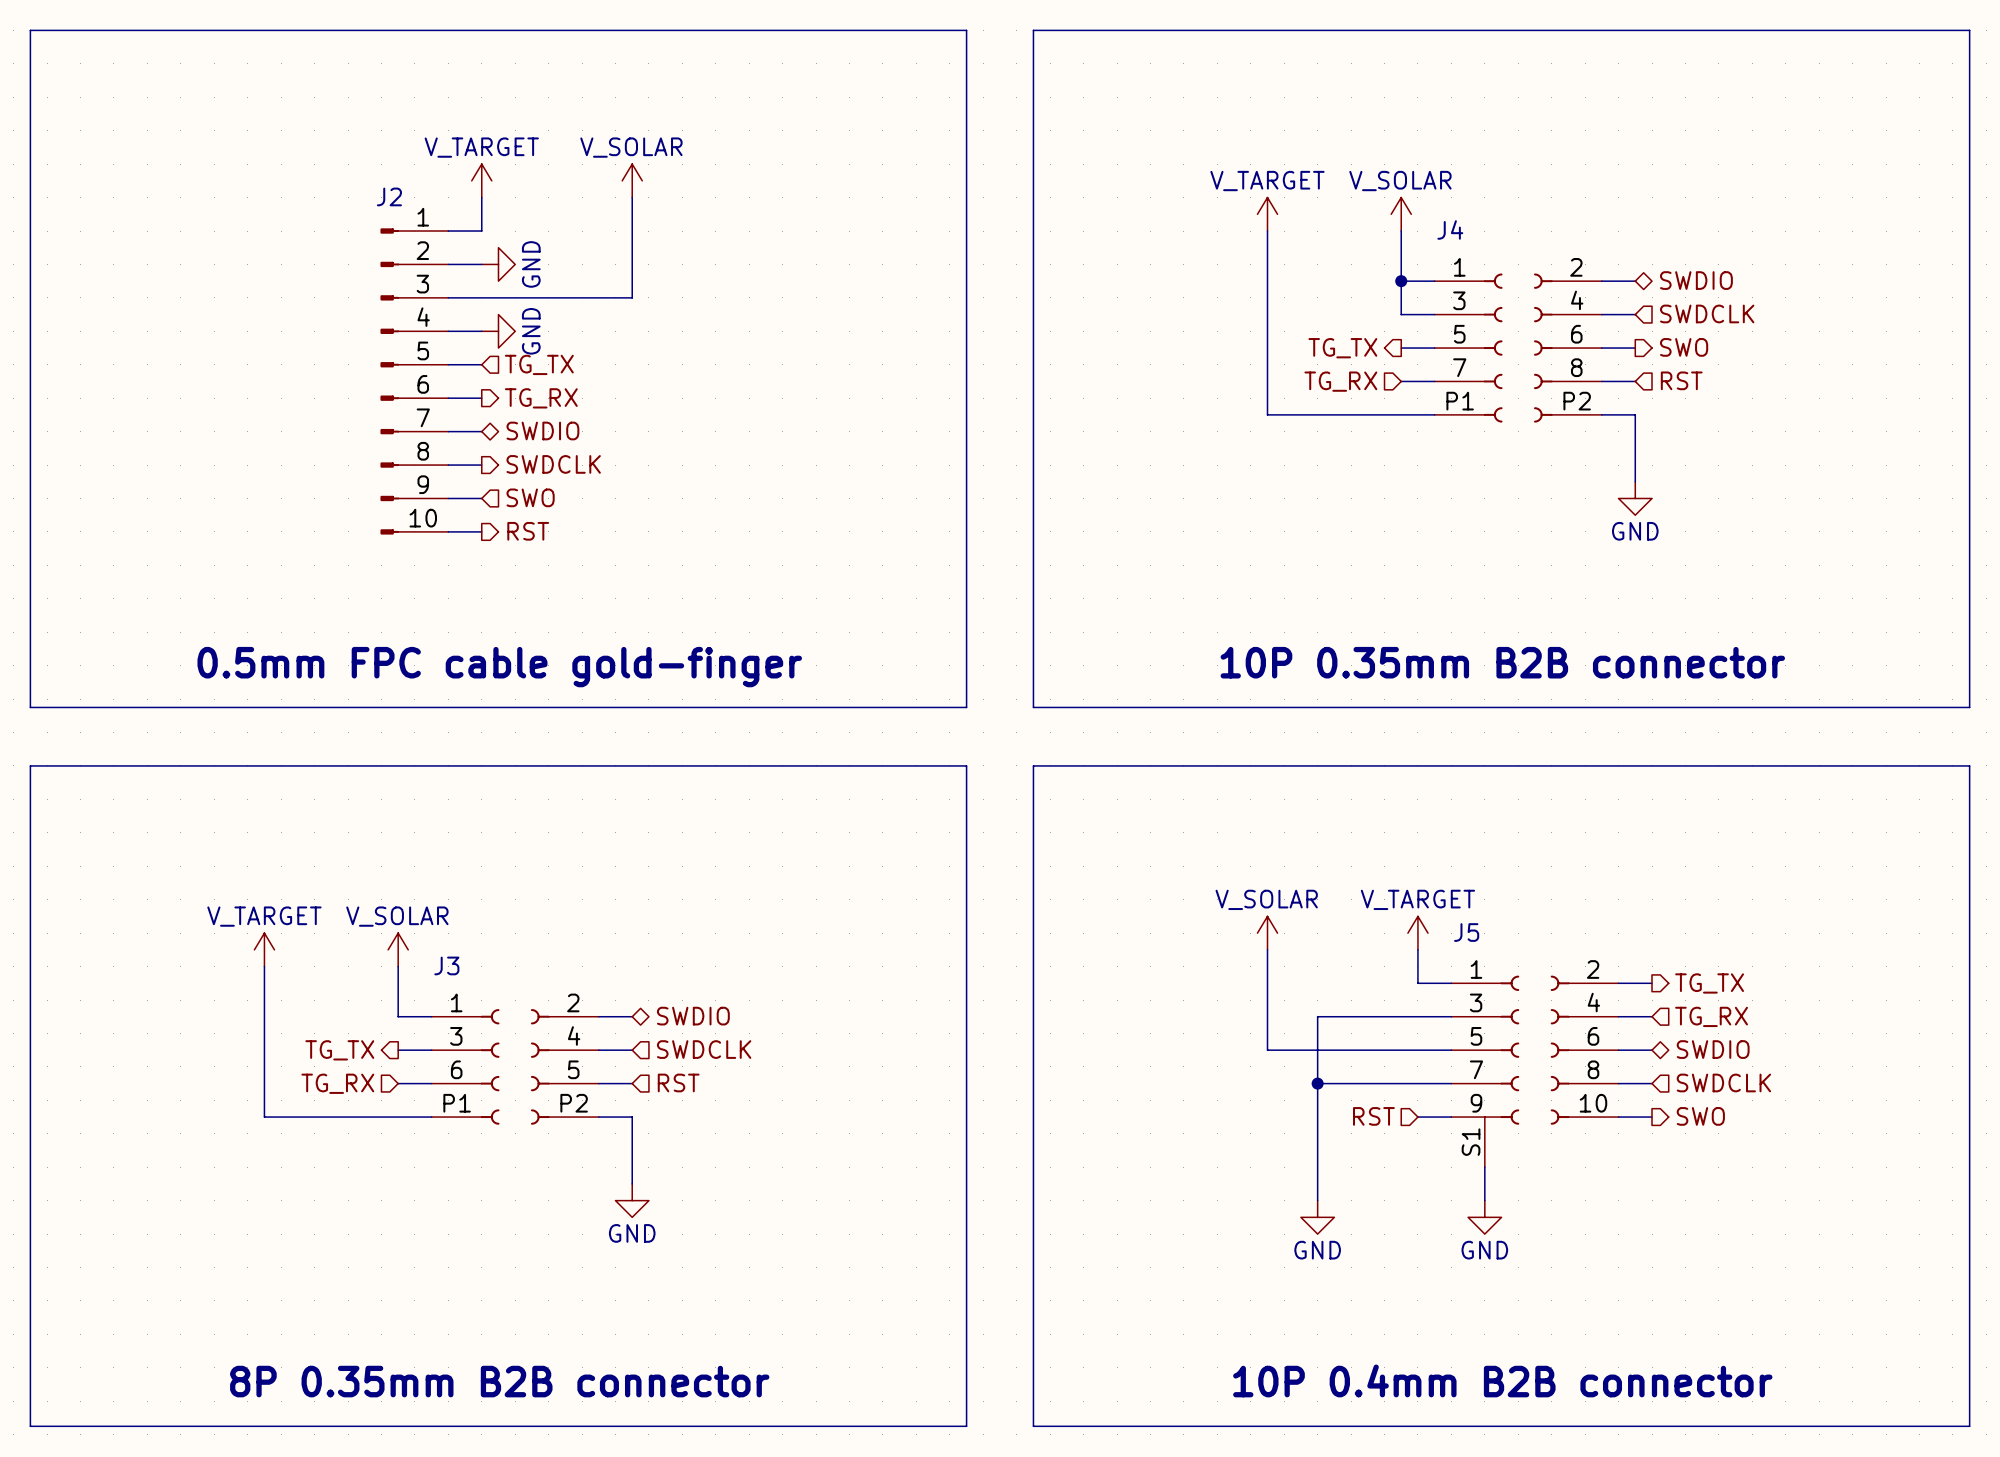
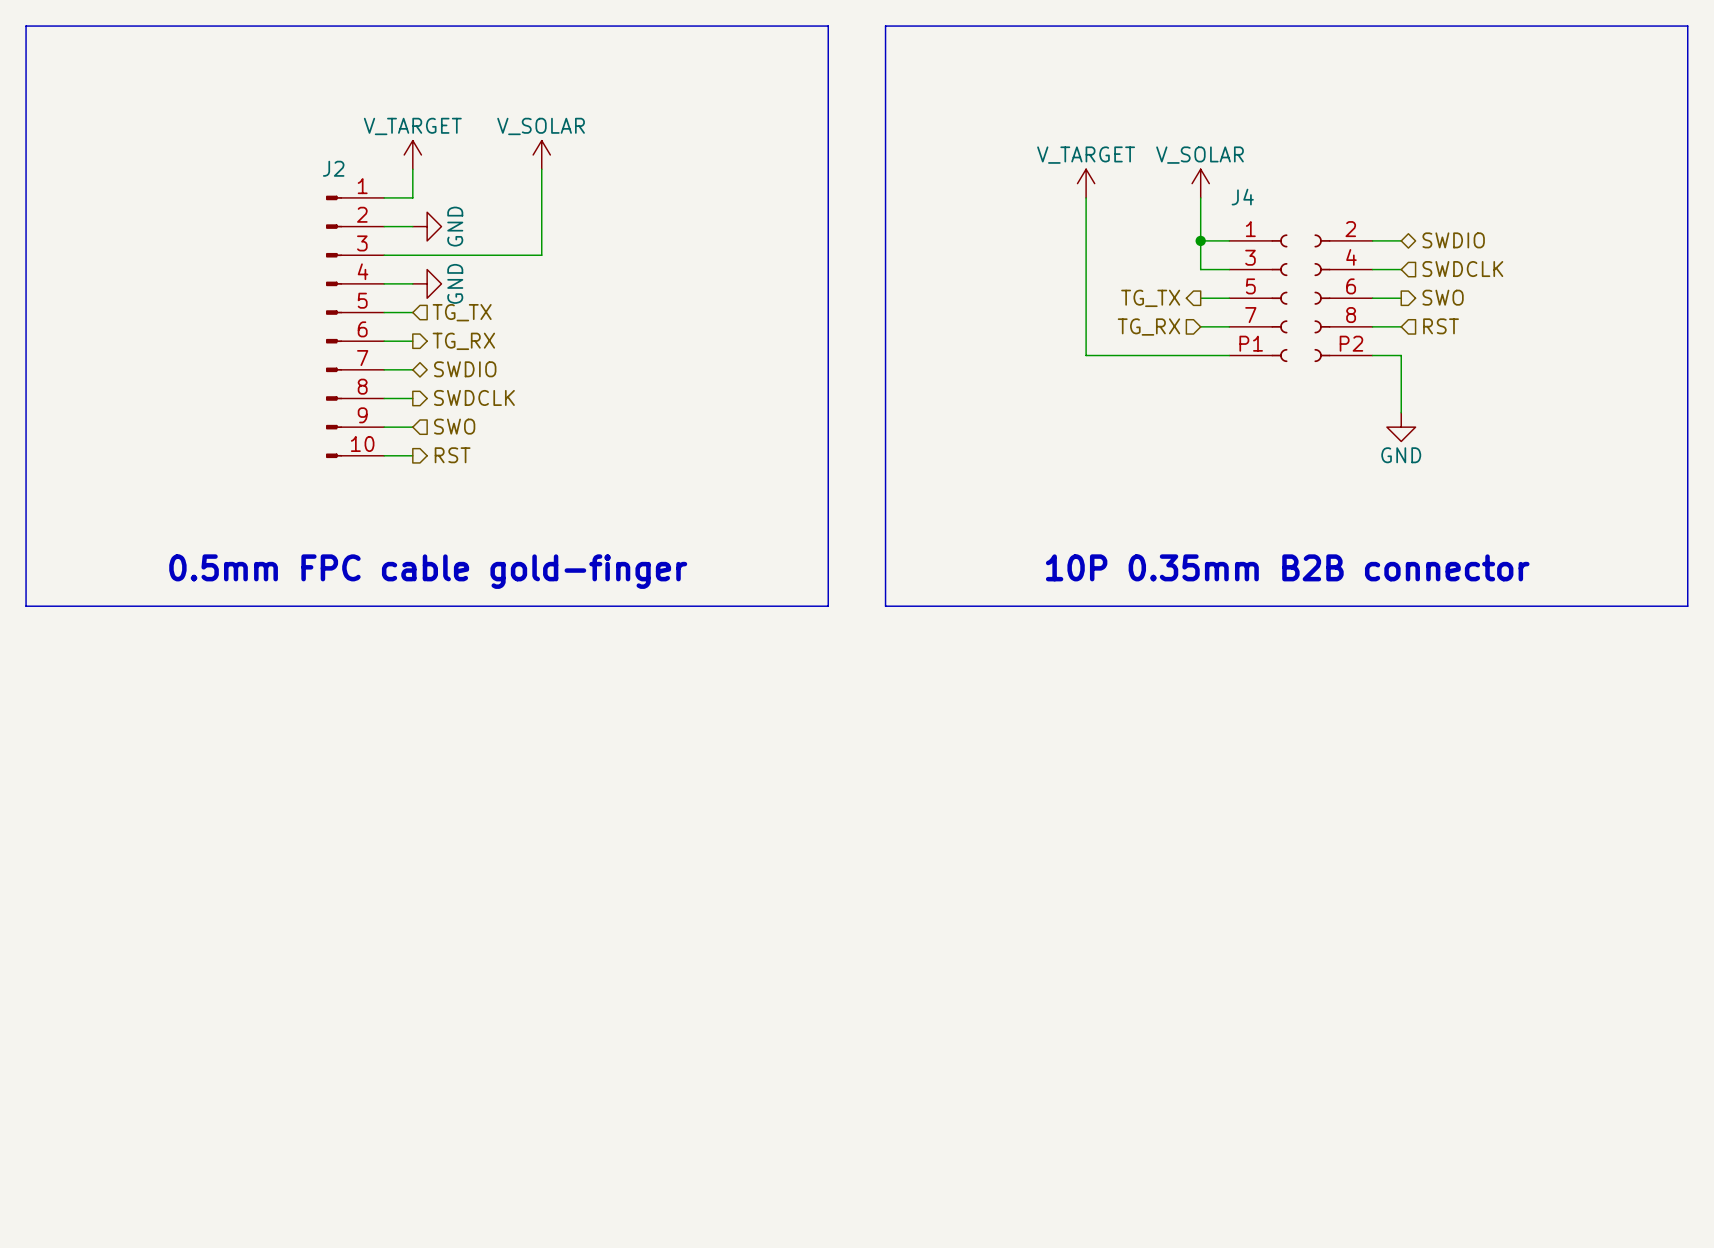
line: (30, 765) (966, 765) (966, 1426) (30, 1426) (30, 765) -> none
line: (1033, 765) (1969, 765) (1969, 1426) (1033, 1426) (1033, 765) -> none
power symbol: V_SOLAR (1267, 933) -> none
power symbol: V_TARGET (1417, 933) -> none
power symbol: V_TARGET (264, 949) -> none
power symbol: V_SOLAR (398, 949) -> none
wire: (1267, 949) (1267, 1050) (1451, 1050) -> none
wire: (1417, 949) (1417, 983) (1451, 983) -> none
wire: (264, 966) (264, 1117) (431, 1117) -> none
wire: (398, 966) (398, 1016) (431, 1016) -> none
wire: (1618, 983) (1652, 983) -> none
hierarchical label: TG_TX (1709, 983) -> none
wire: (598, 1016) (632, 1016) -> none
hierarchical label: SWDIO (693, 1016) -> none
wire: (1451, 1016) (1317, 1016) (1317, 1200) -> none
wire: (1618, 1016) (1652, 1016) -> none
hierarchical label: TG_RX (1711, 1016) -> none
hierarchical label: SWDCLK (704, 1049) -> none
hierarchical label: SWDIO (1713, 1049) -> none
hierarchical label: TG_TX (339, 1050) -> none
wire: (398, 1050) (431, 1050) -> none
wire: (598, 1050) (632, 1050) -> none
wire: (1618, 1050) (1652, 1050) -> none
J3: (515, 1066) -> none
J5: (1534, 1071) -> none
hierarchical label: RST (678, 1082) -> none
hierarchical label: SWDCLK (1723, 1082) -> none
hierarchical label: TG_RX (337, 1083) -> none
wire: (398, 1083) (431, 1083) -> none
wire: (598, 1083) (632, 1083) -> none
wire: (1317, 1083) (1451, 1083) -> none
junction: (1317, 1083) -> none
wire: (1618, 1083) (1652, 1083) -> none
hierarchical label: RST (1373, 1116) -> none
hierarchical label: SWO (1700, 1116) -> none
wire: (598, 1117) (632, 1117) (632, 1183) -> none
wire: (1417, 1117) (1451, 1117) -> none
wire: (1618, 1117) (1652, 1117) -> none
wire: (1484, 1167) (1484, 1200) -> none
power symbol: GND (632, 1200) -> none
power symbol: GND (1317, 1217) -> none
power symbol: GND (1484, 1217) -> none
text: 10P 0.4mm B2B connector (1502, 1380) -> none
text: 8P 0.35mm B2B connector (499, 1381) -> none

